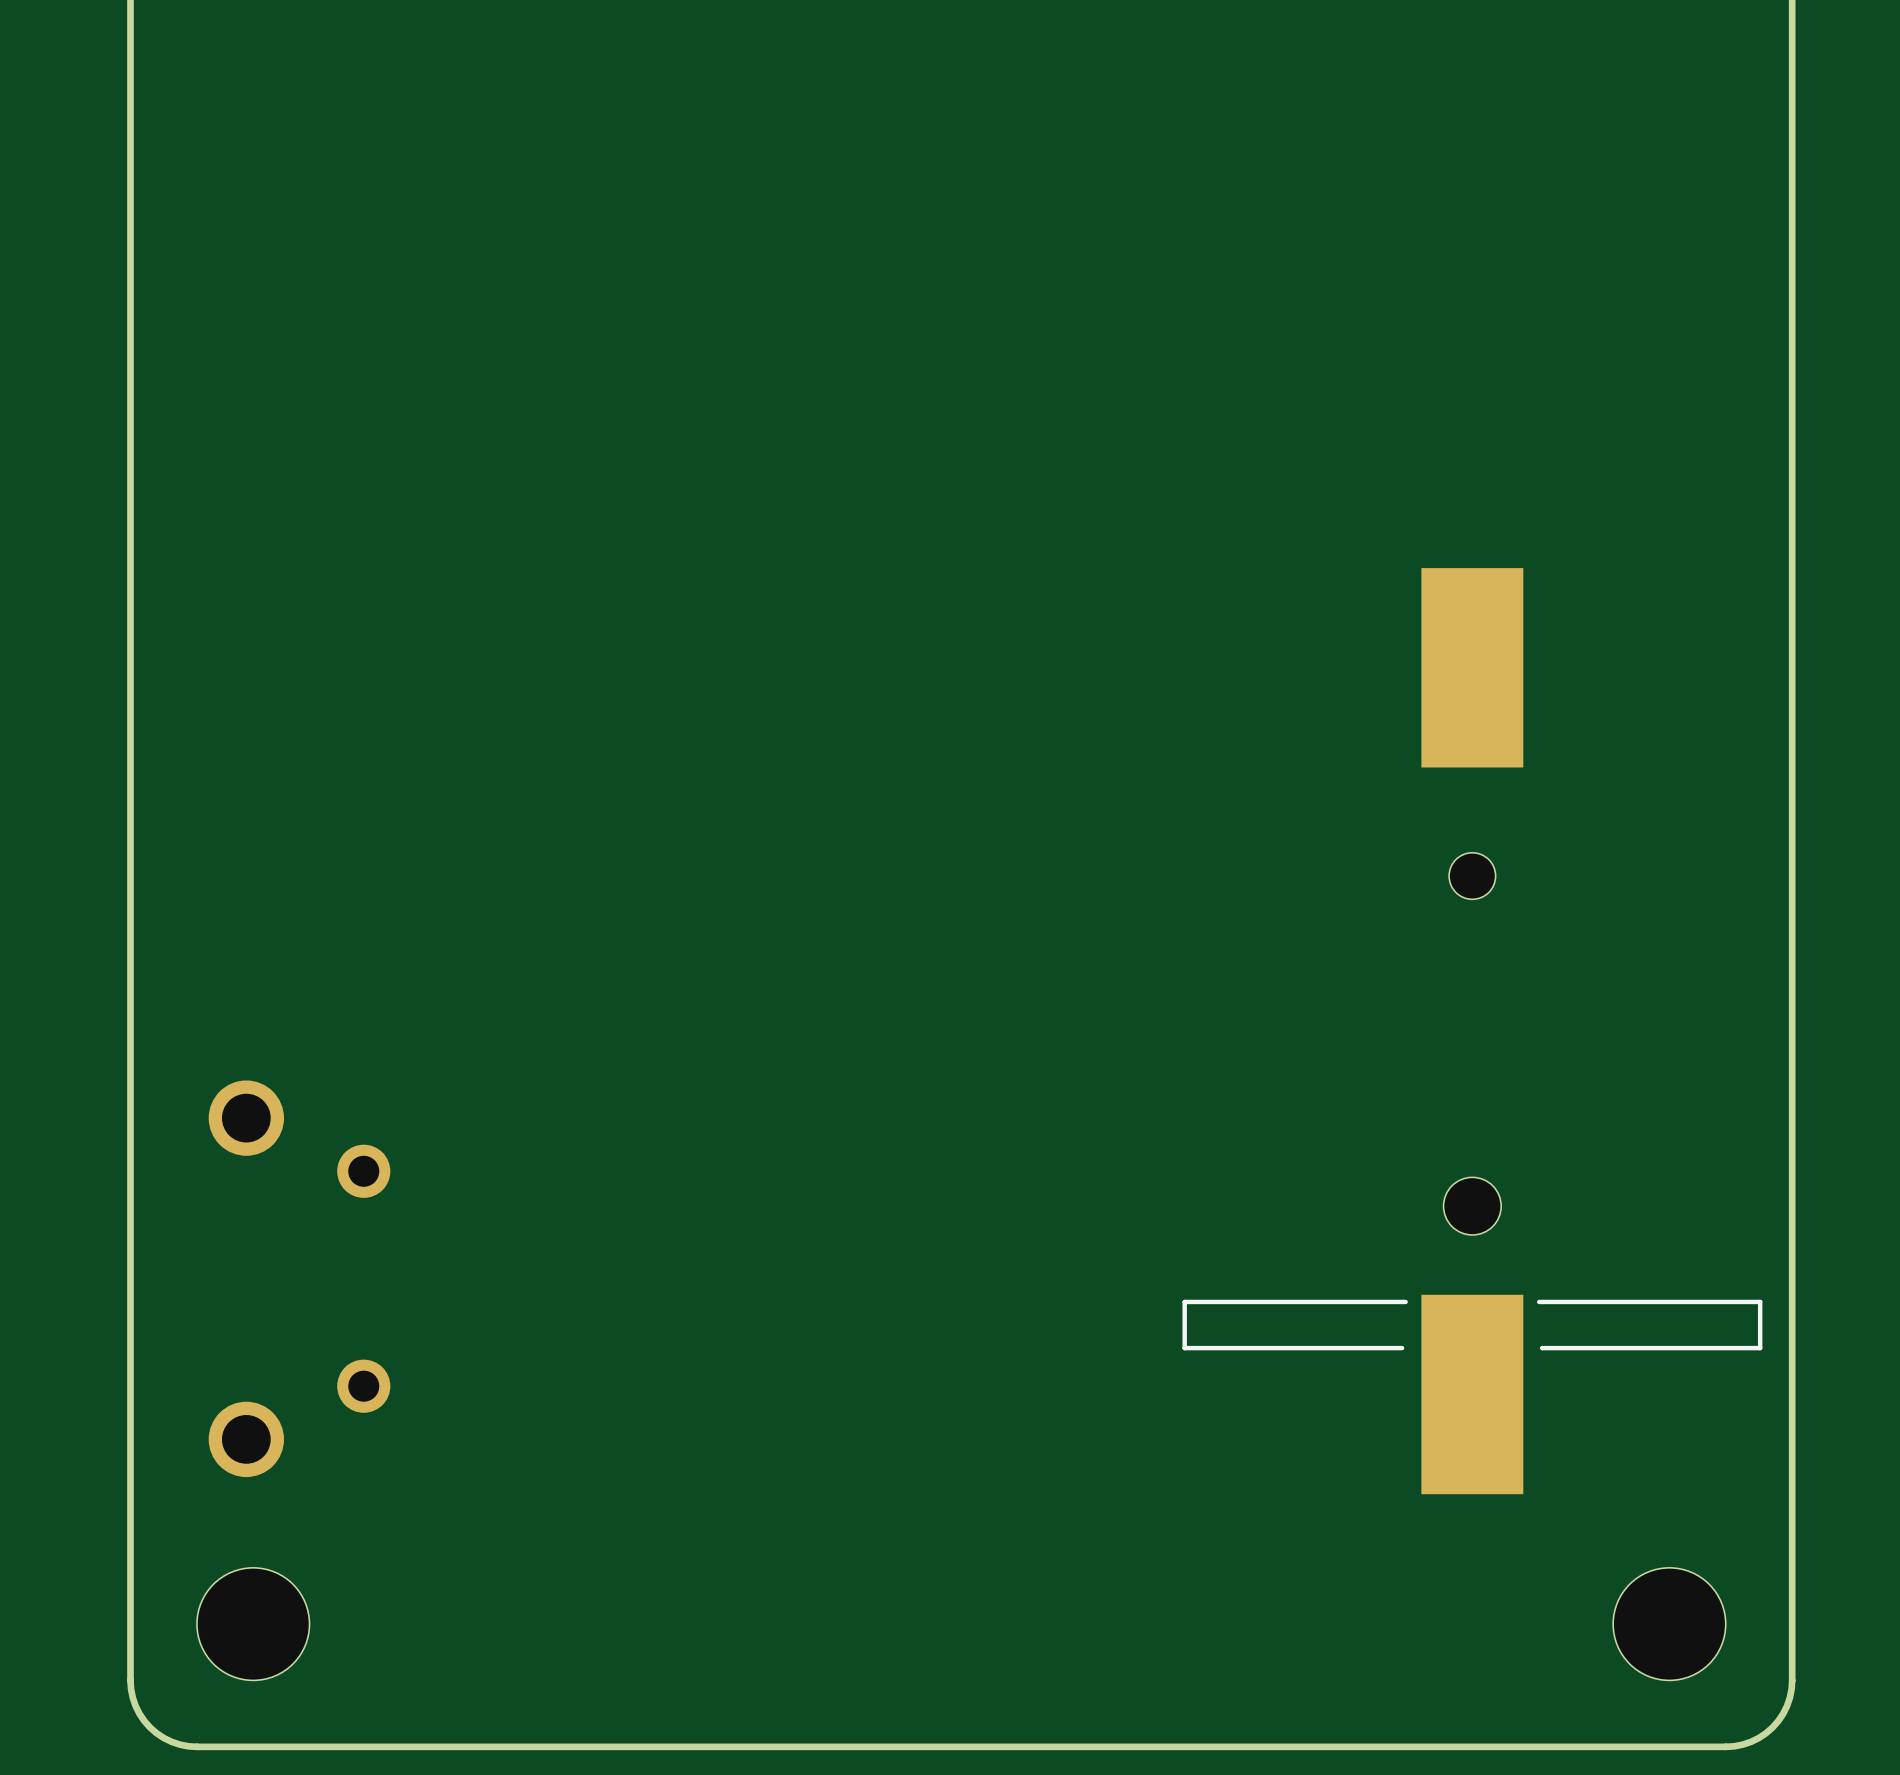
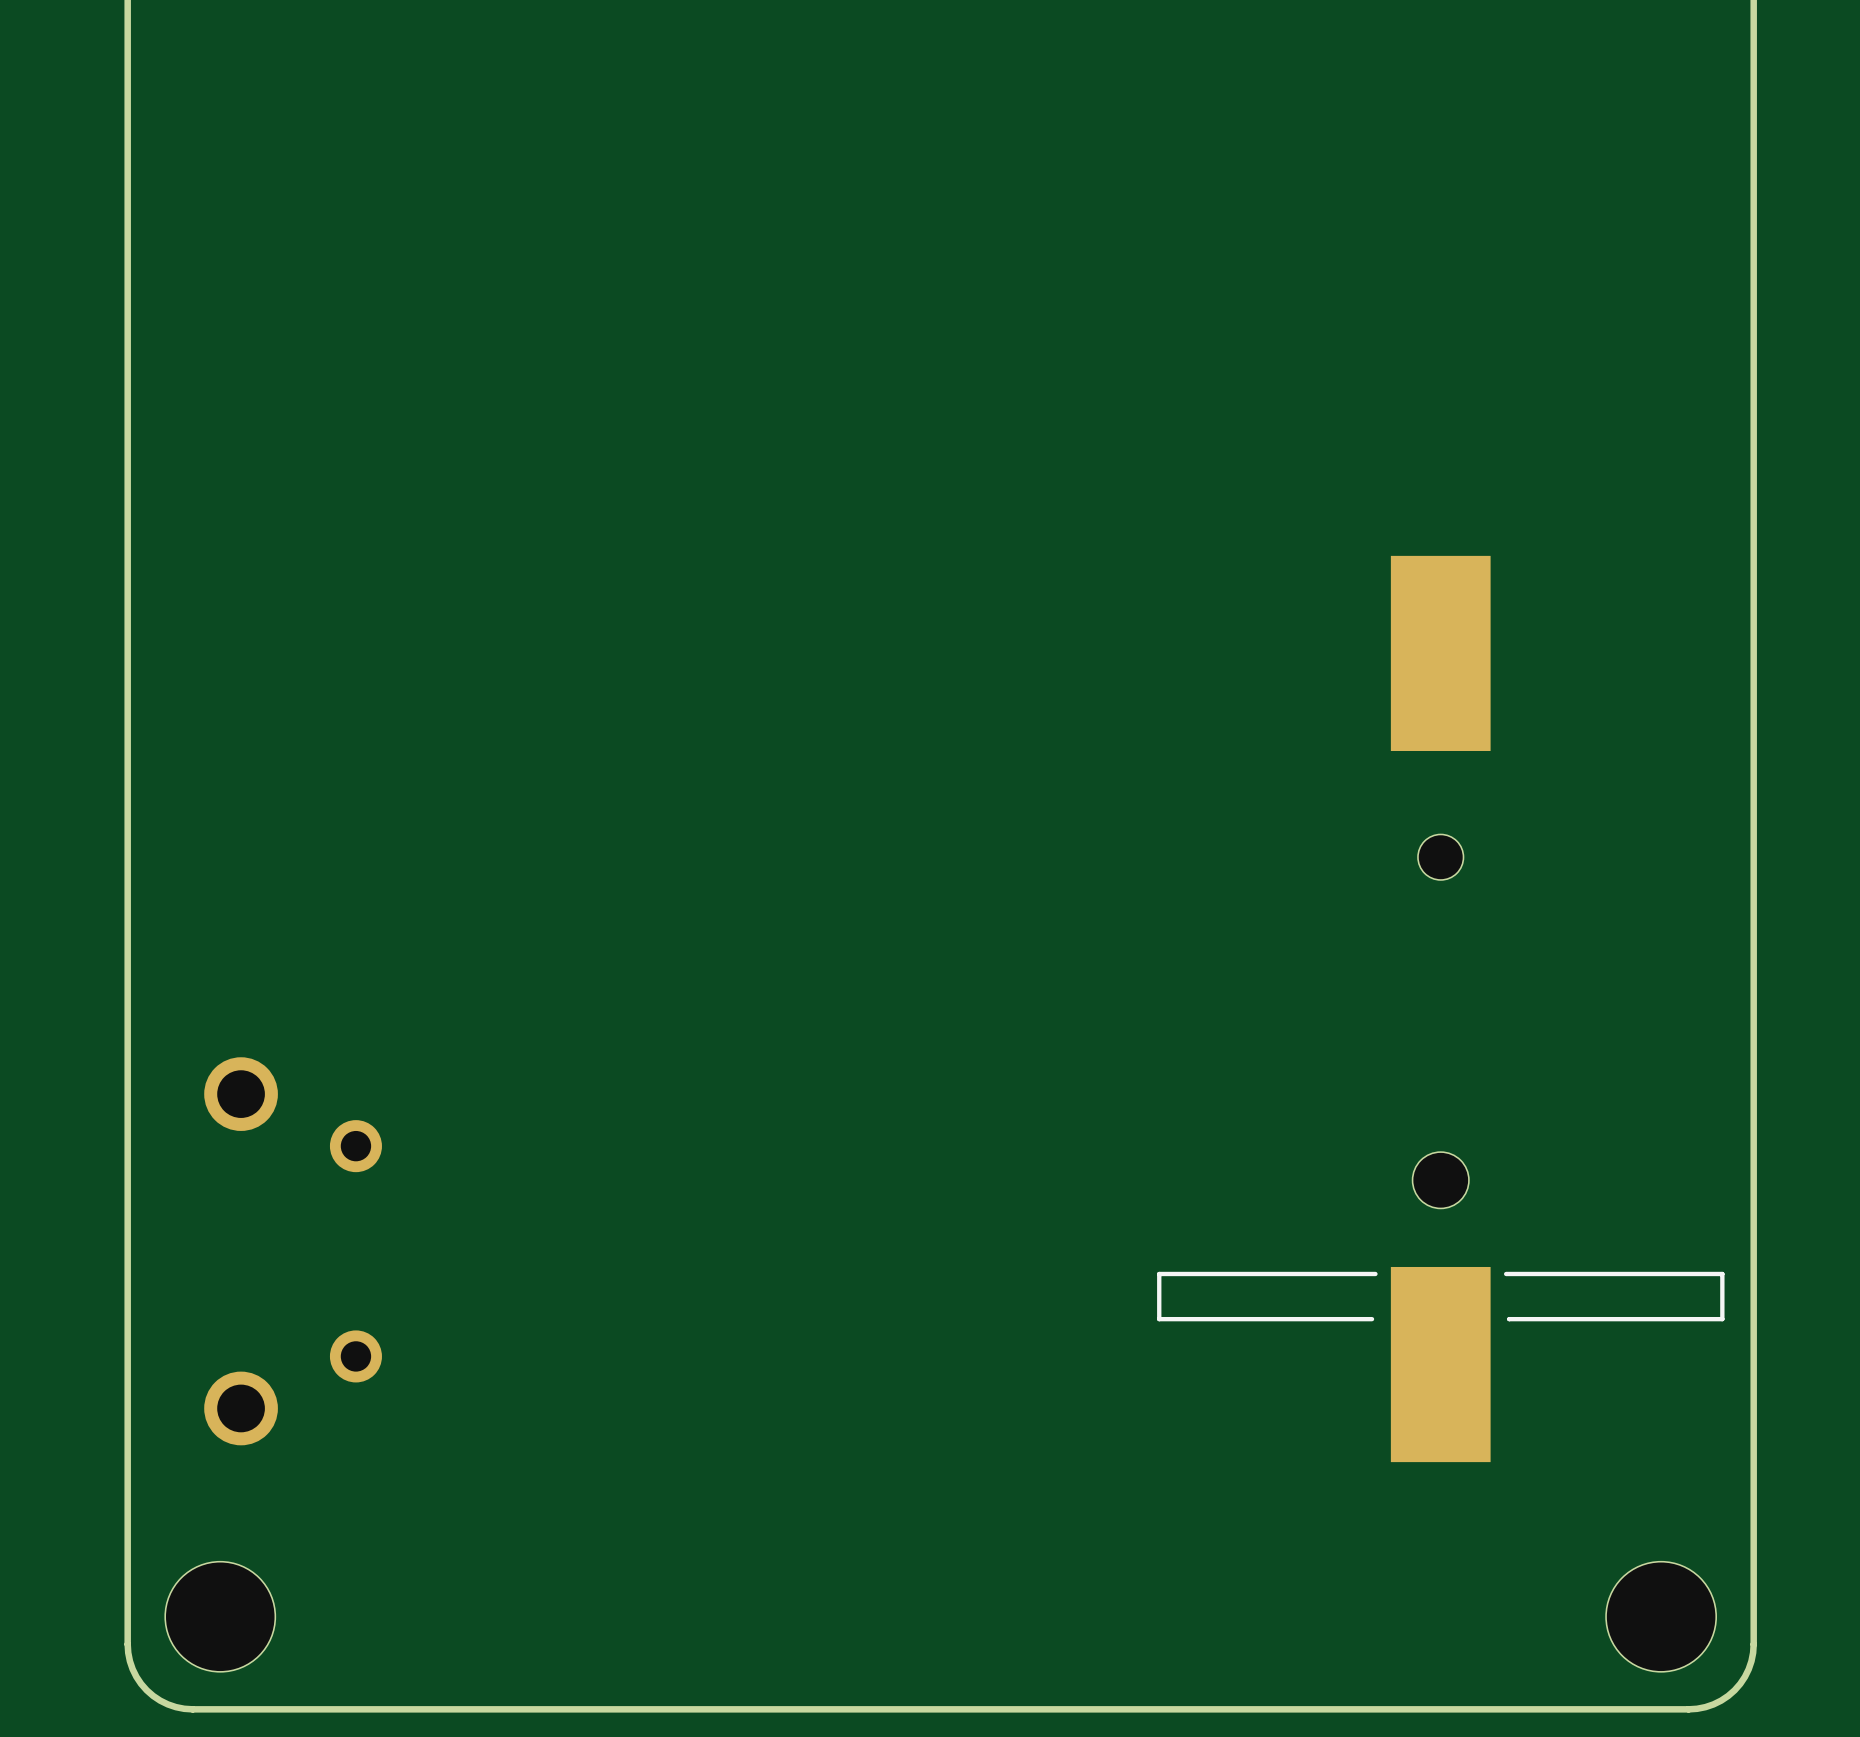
part position: (253, 1624) -> (220, 1616)
part position: (1669, 1624) -> (1661, 1616)

